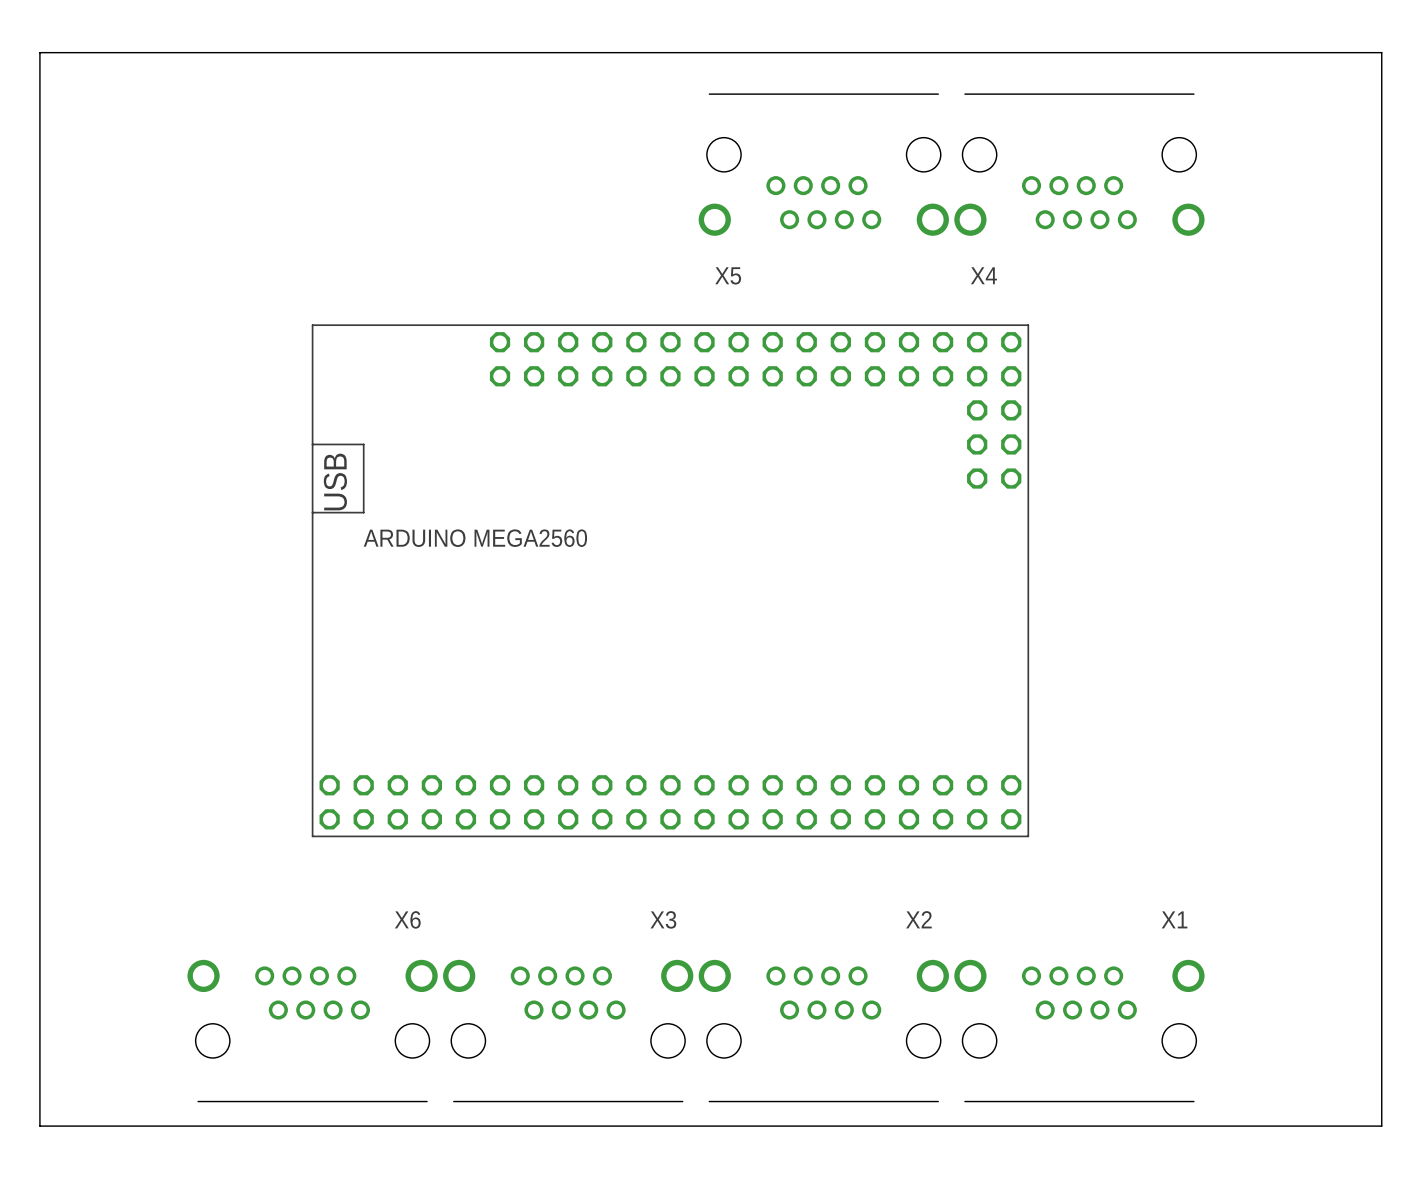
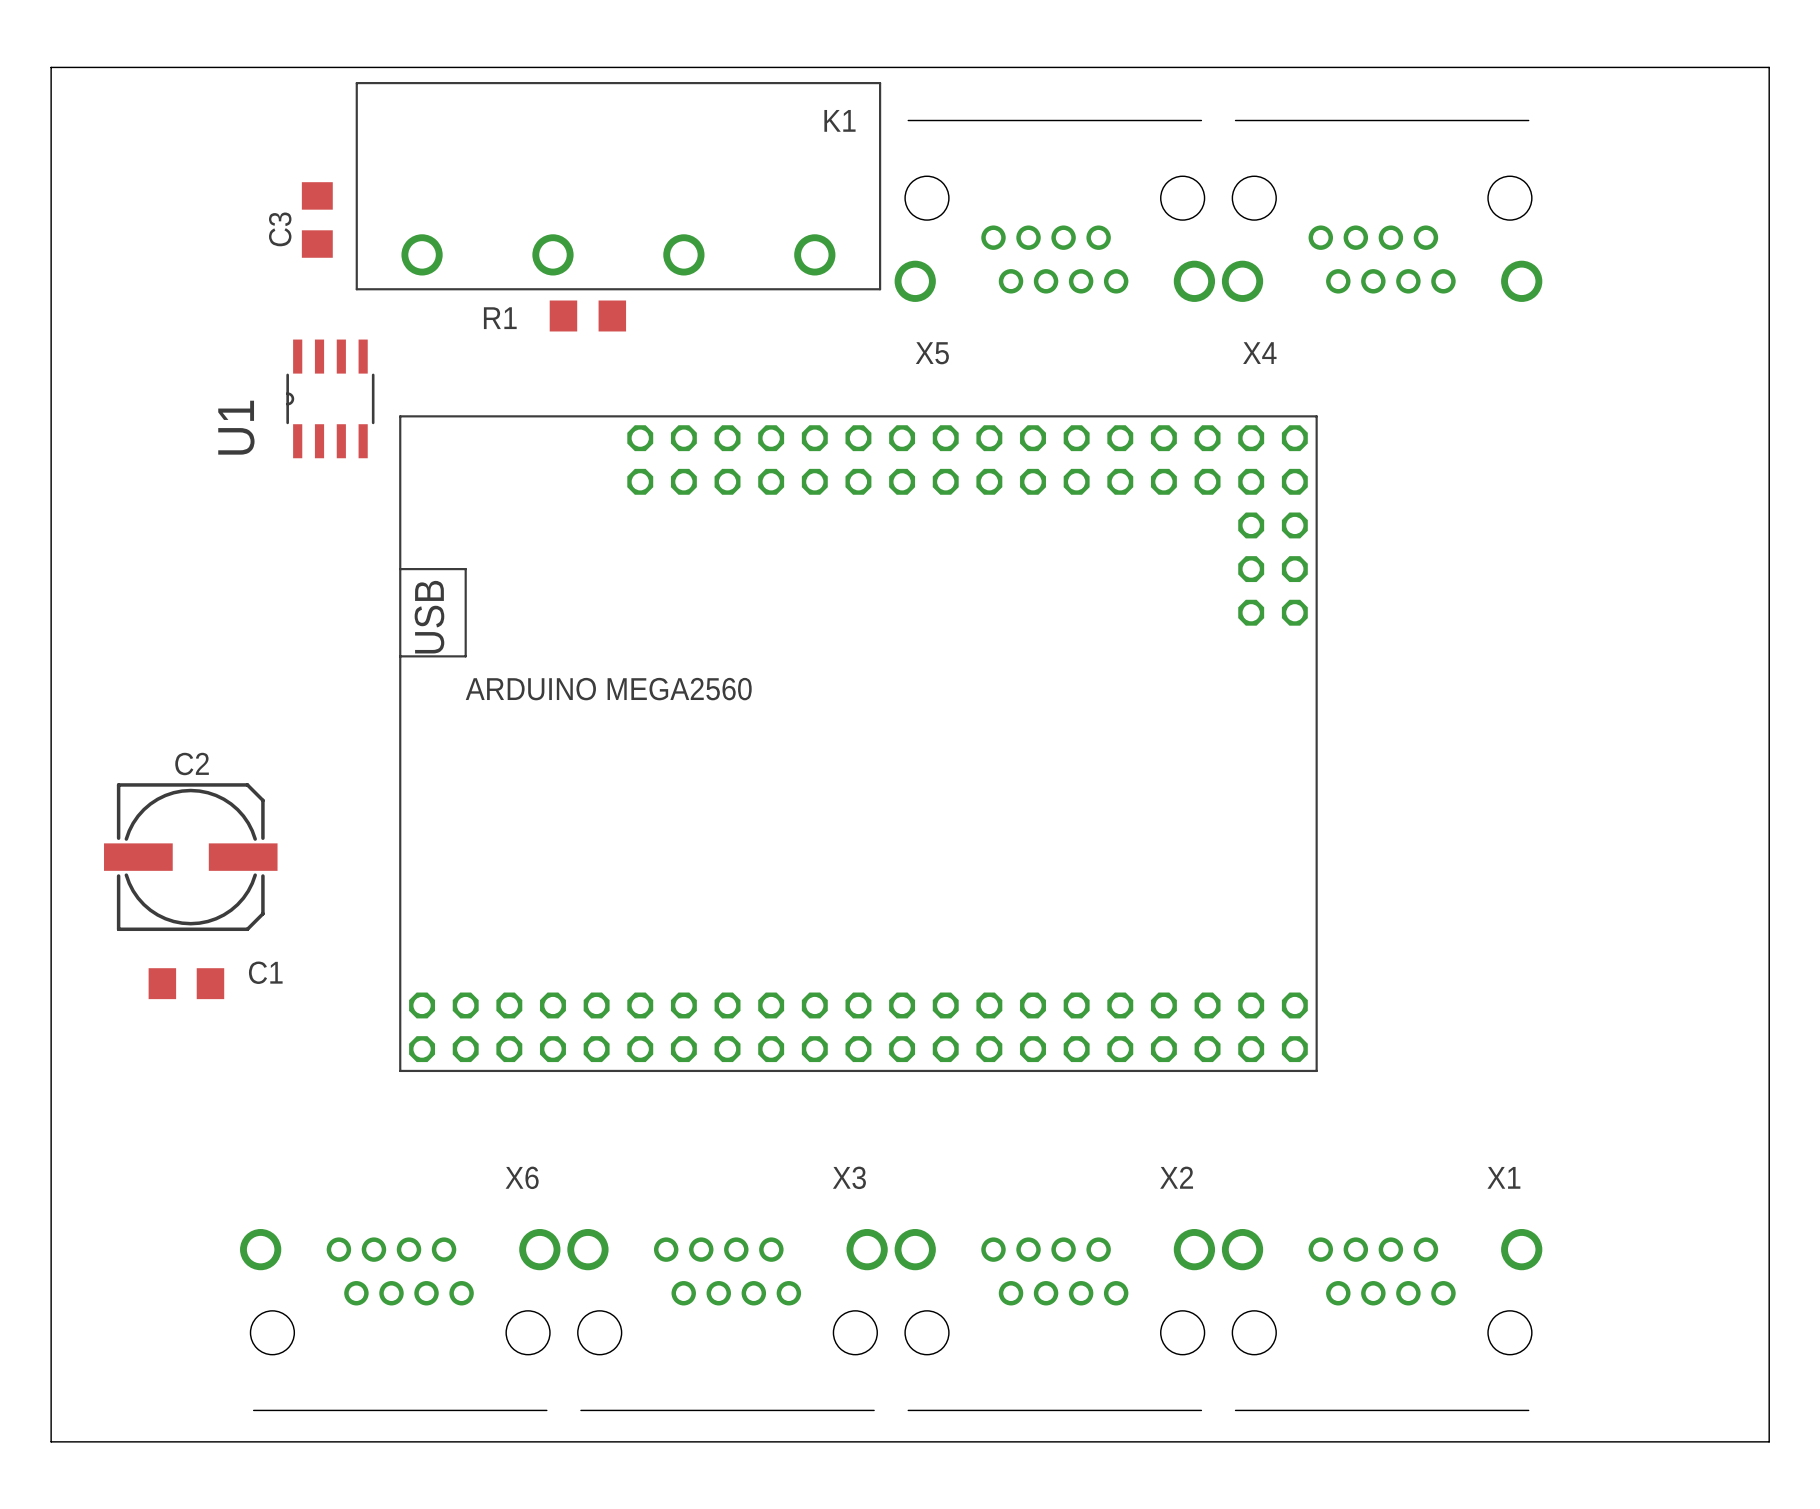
K1: none -> (618, 186)
C3: none -> (317, 219)
R1: none -> (587, 315)
U1: none -> (330, 398)
C2: none -> (190, 857)
C1: none -> (186, 983)

